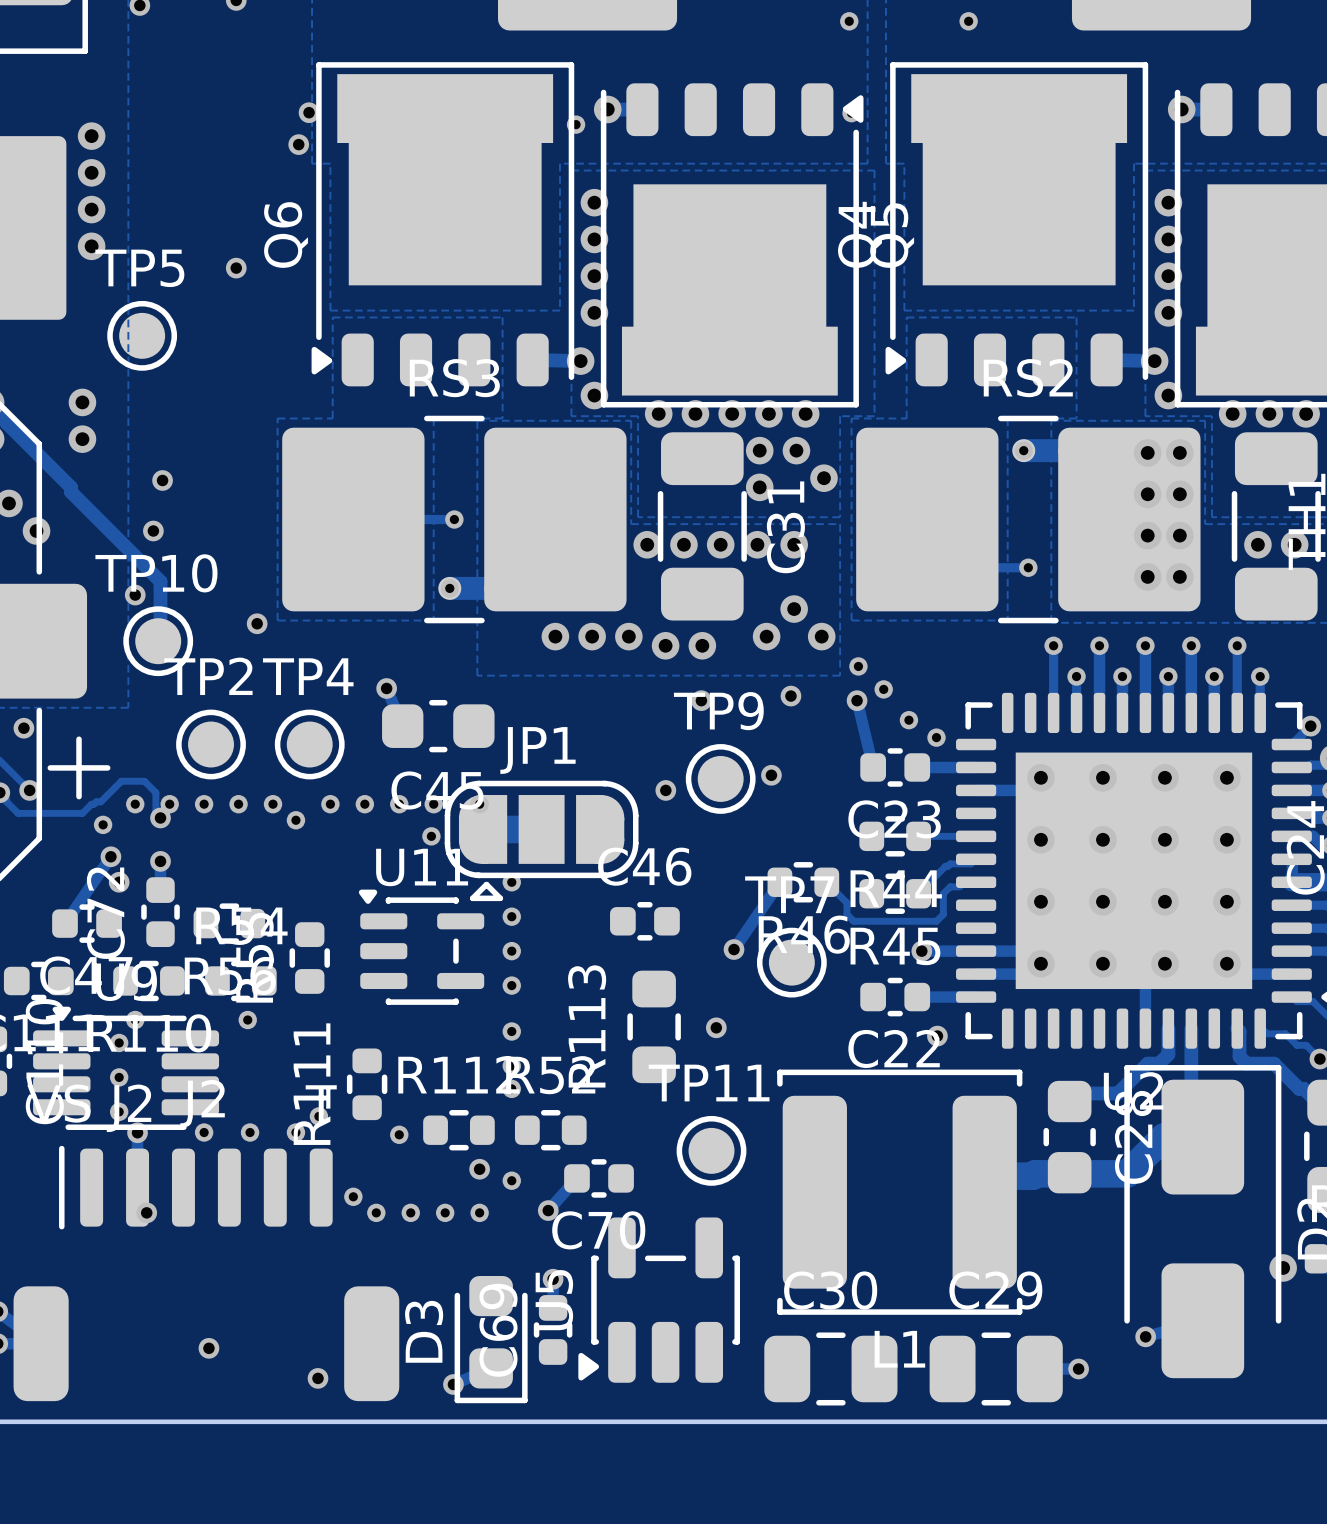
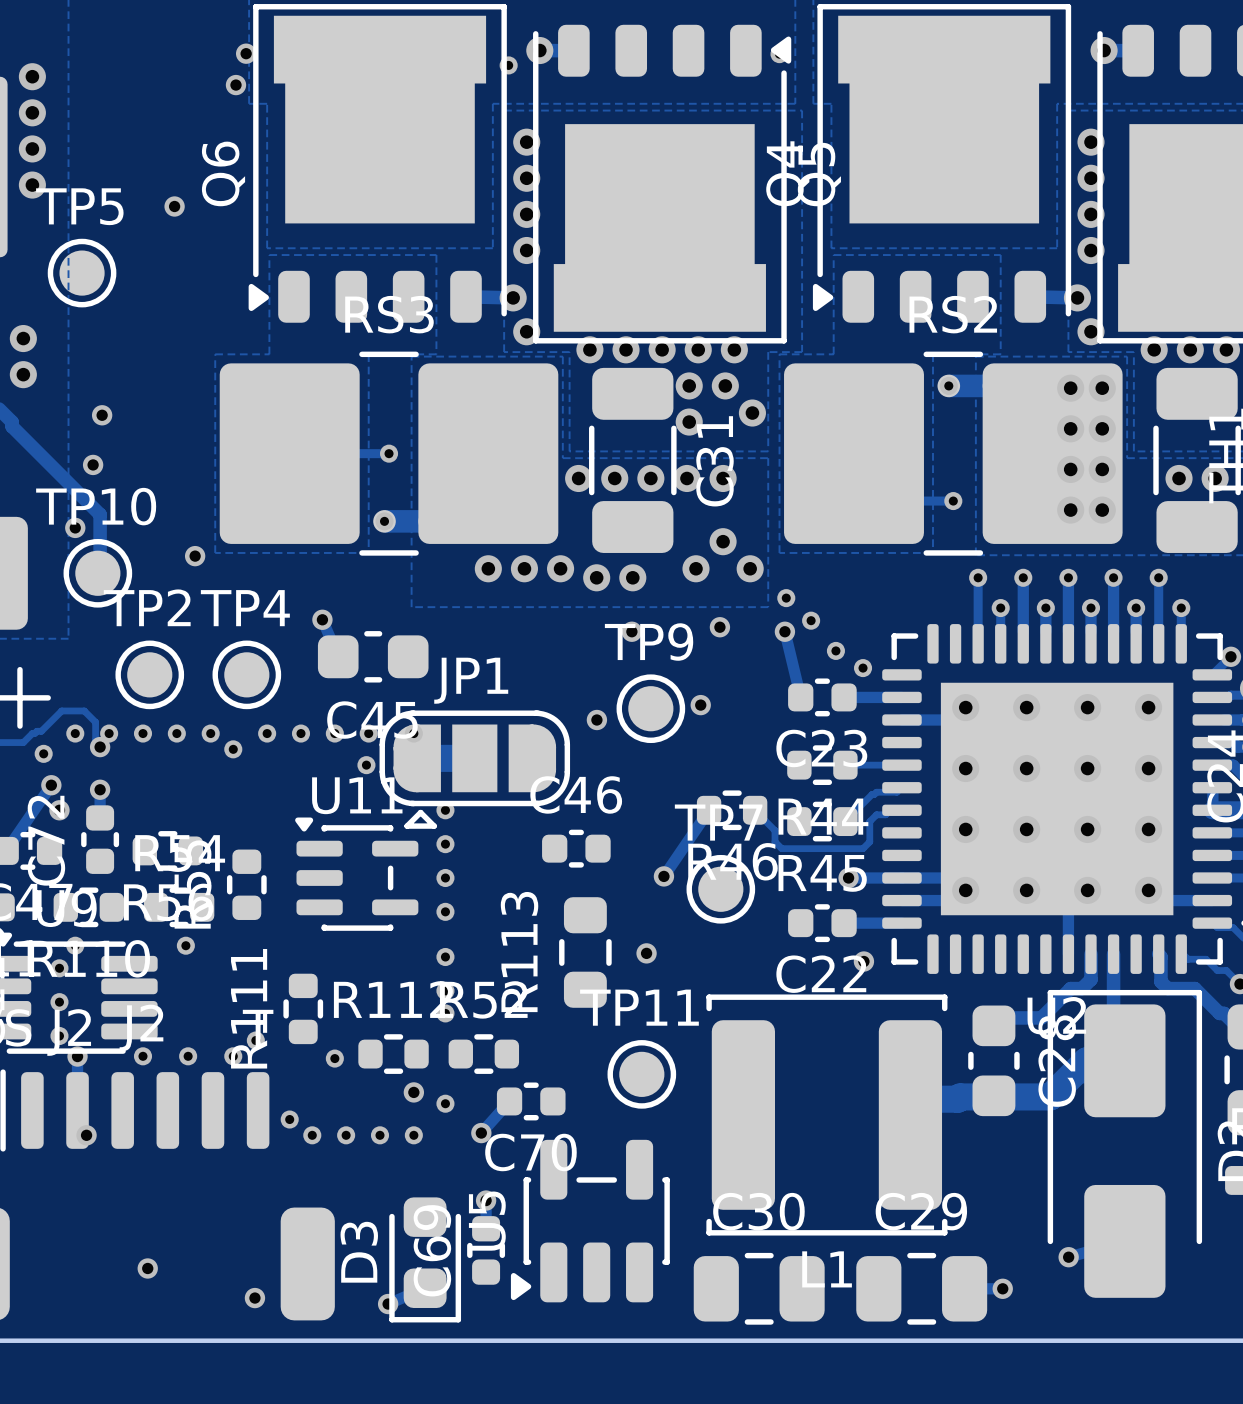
via: (1283, 1267) -> none

